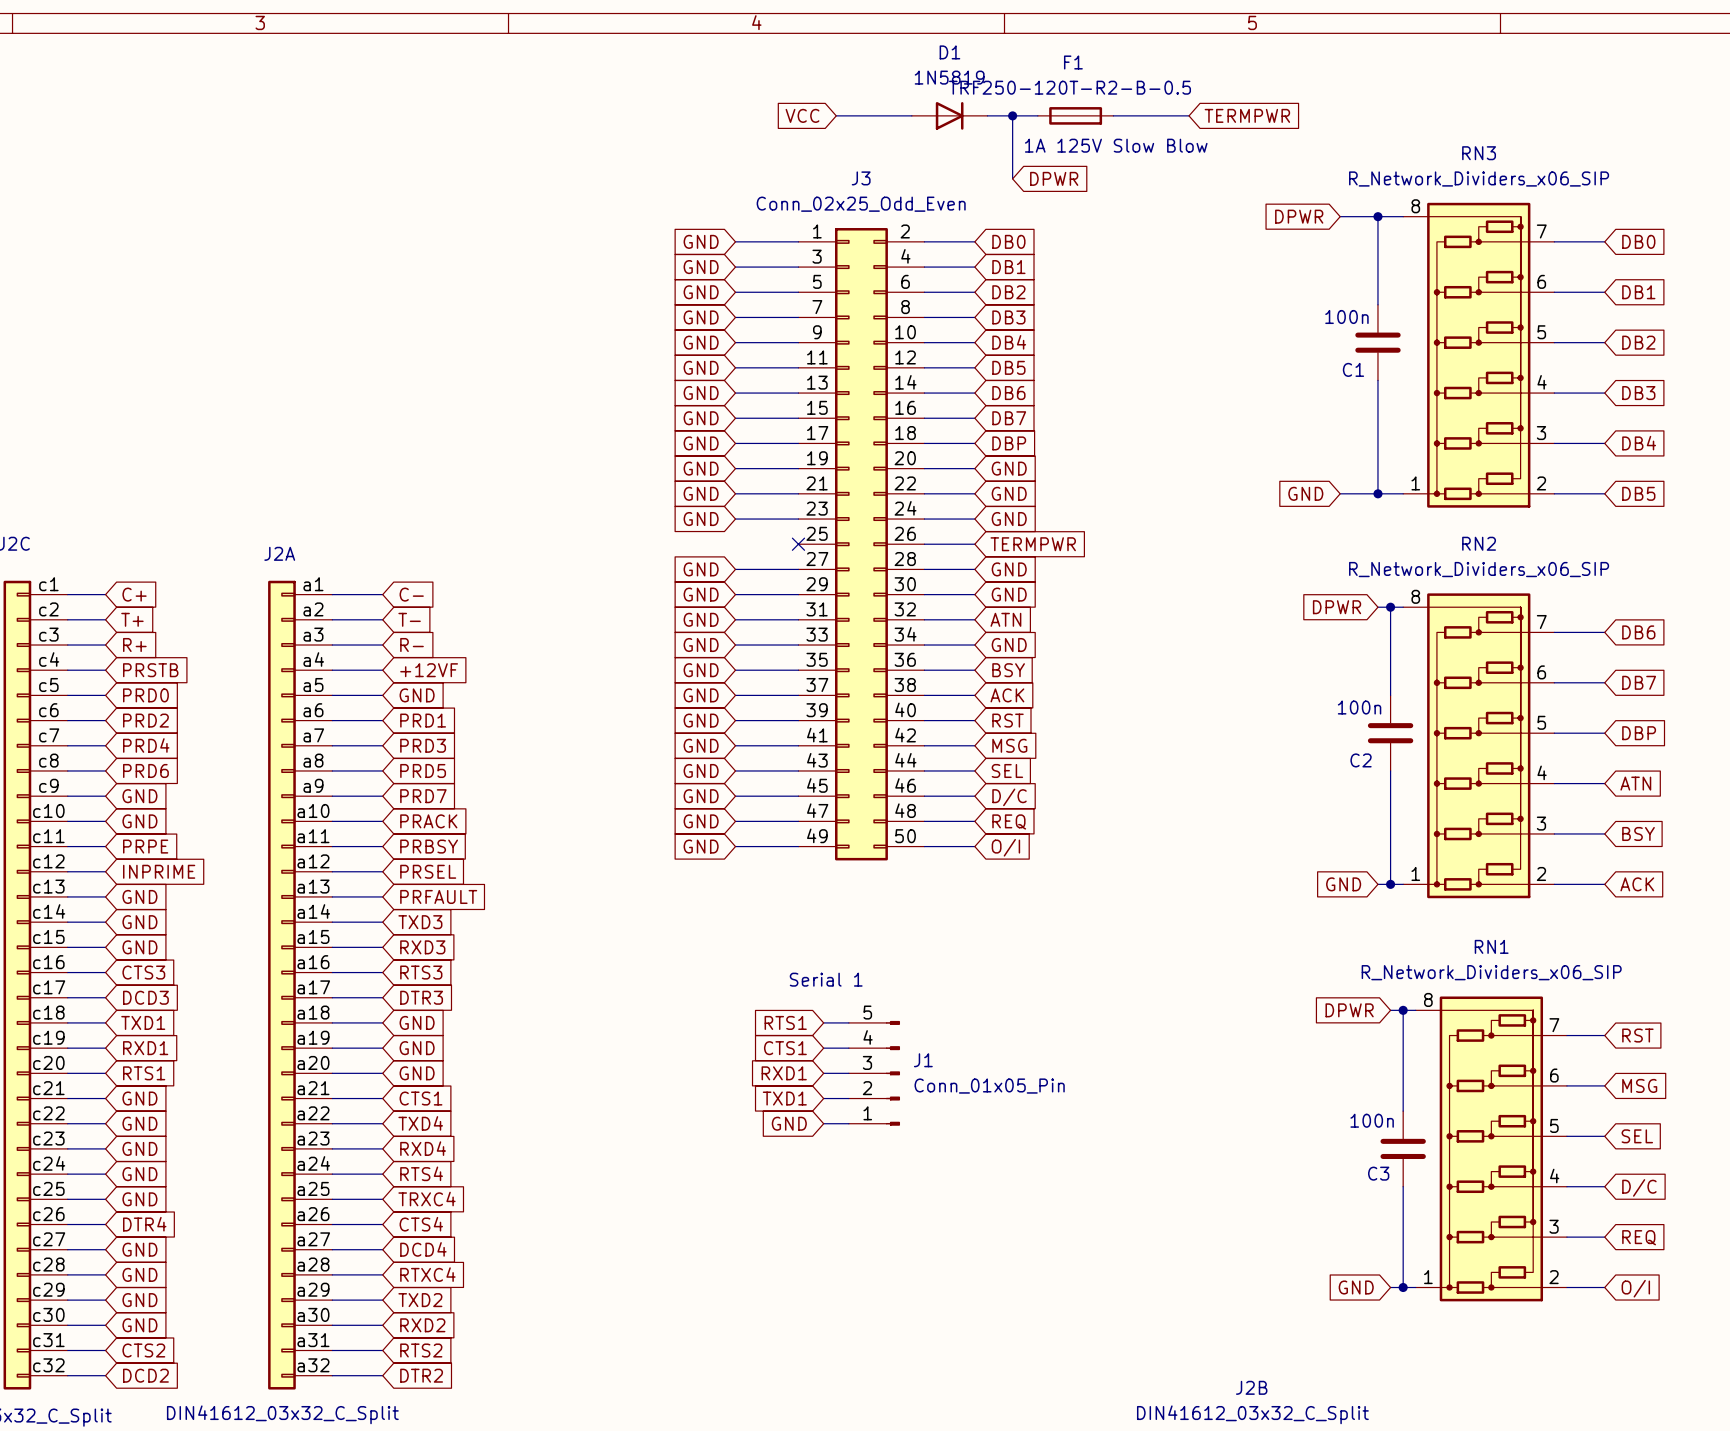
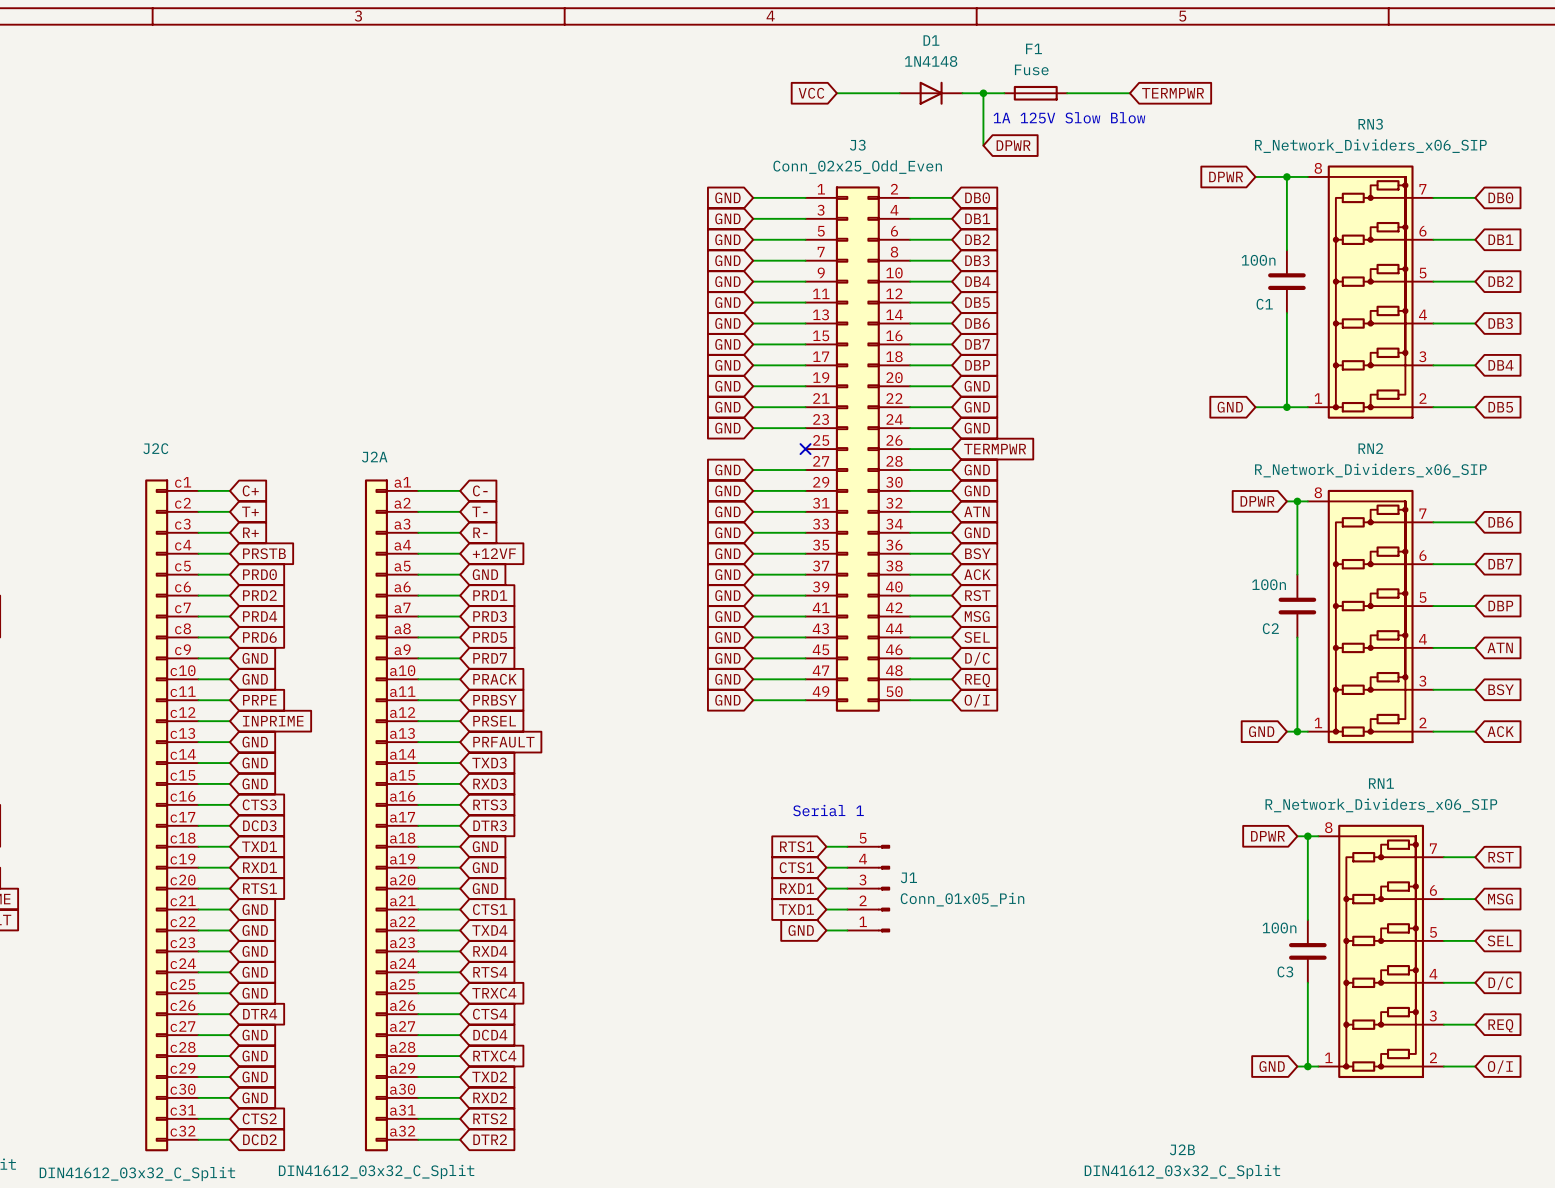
D1 value: 1N5819 (949, 77) -> 1N4148 (931, 61)
F1 value: TRF250-120T-R2-B-0.5 (1069, 87) -> Fuse (1031, 69)

